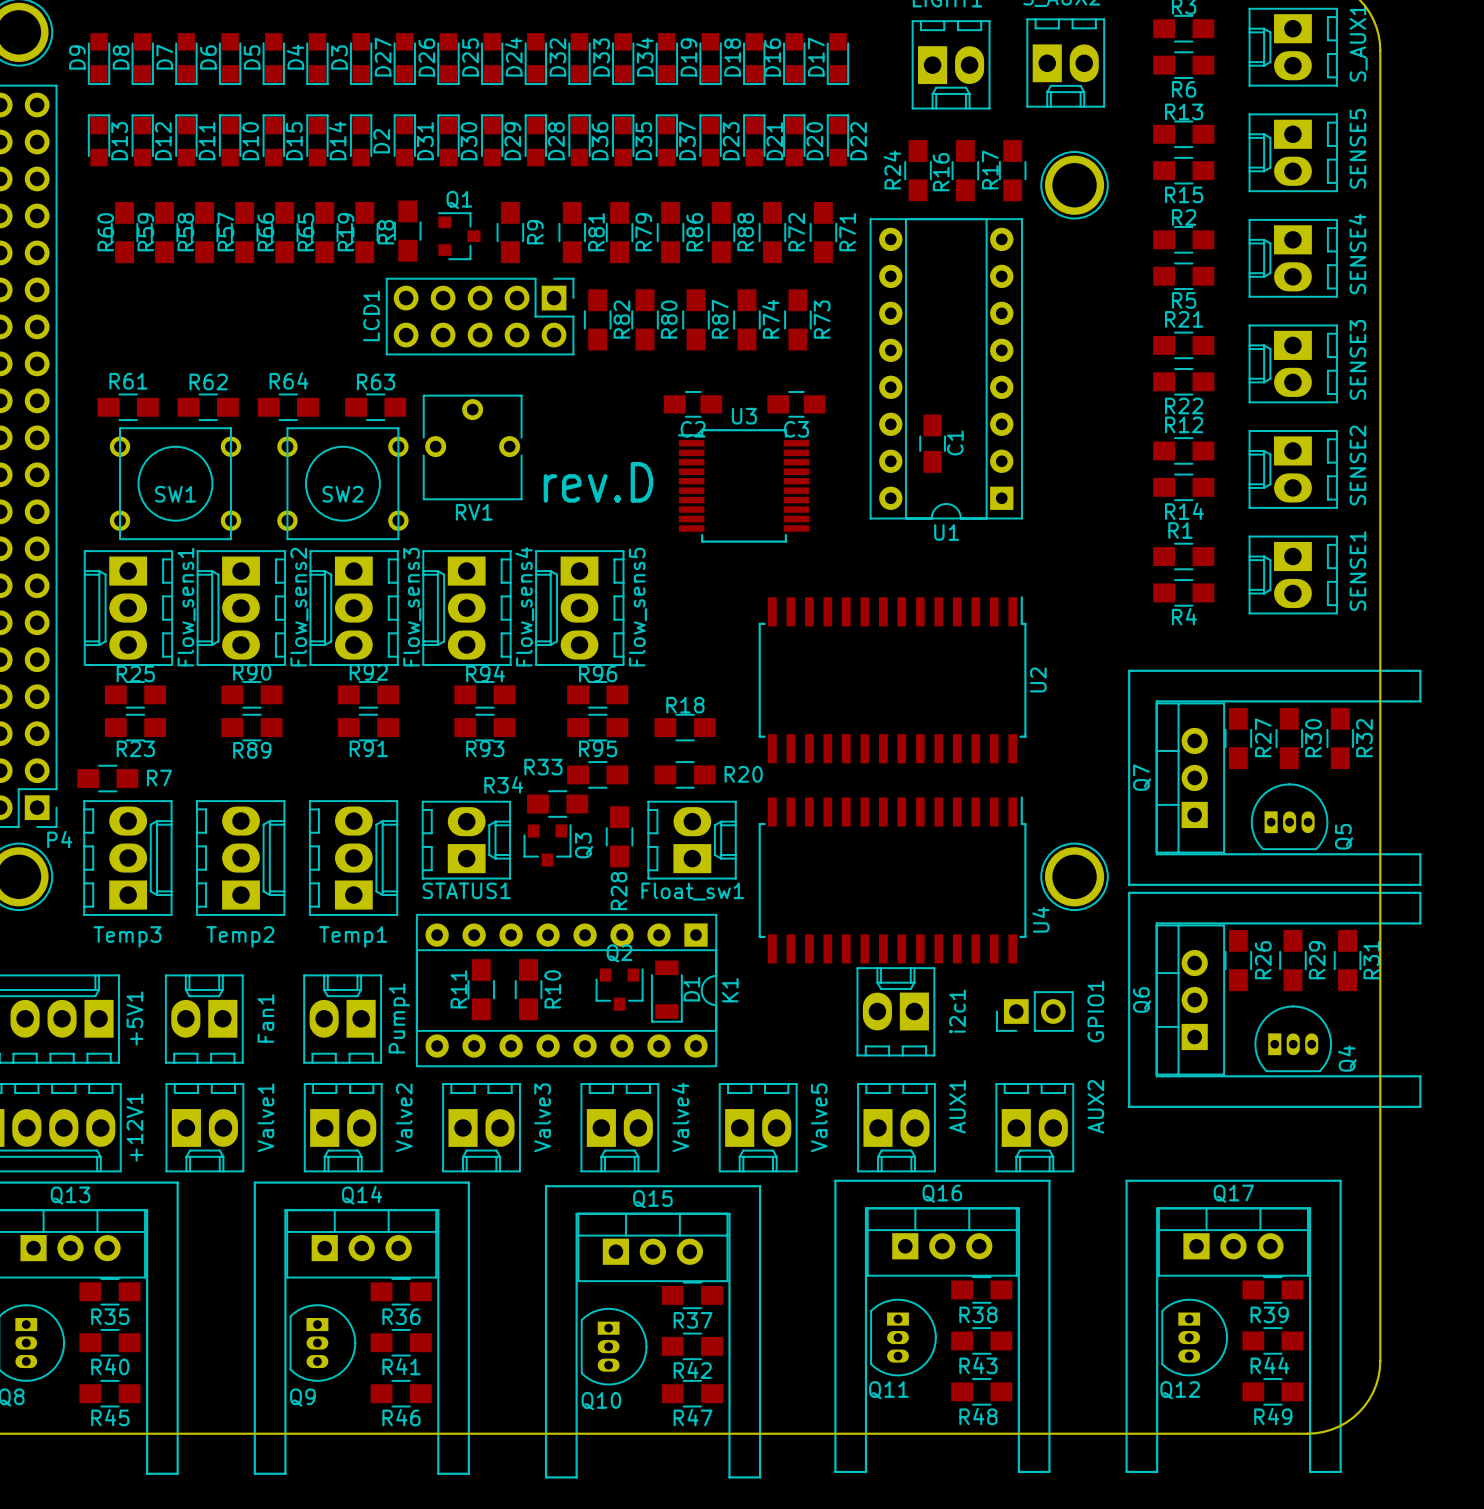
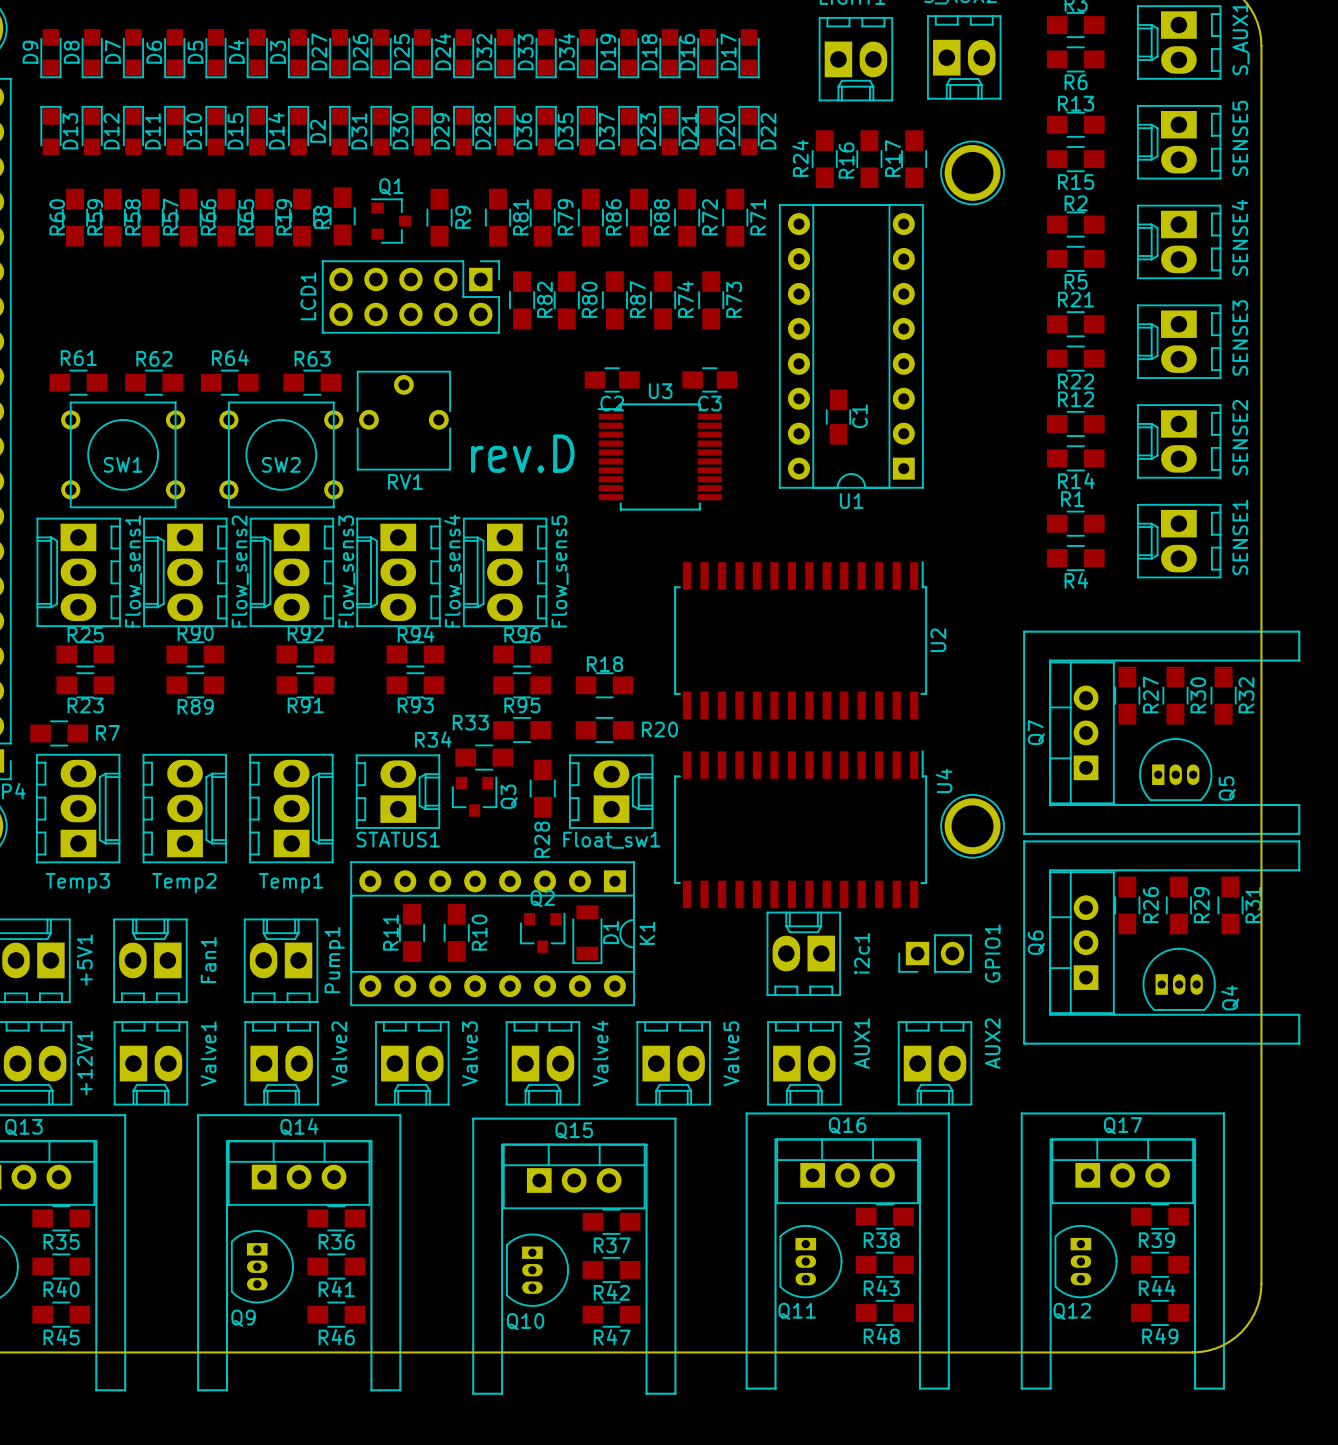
U4 name position: U4 (1040, 919) -> U4 (944, 780)

